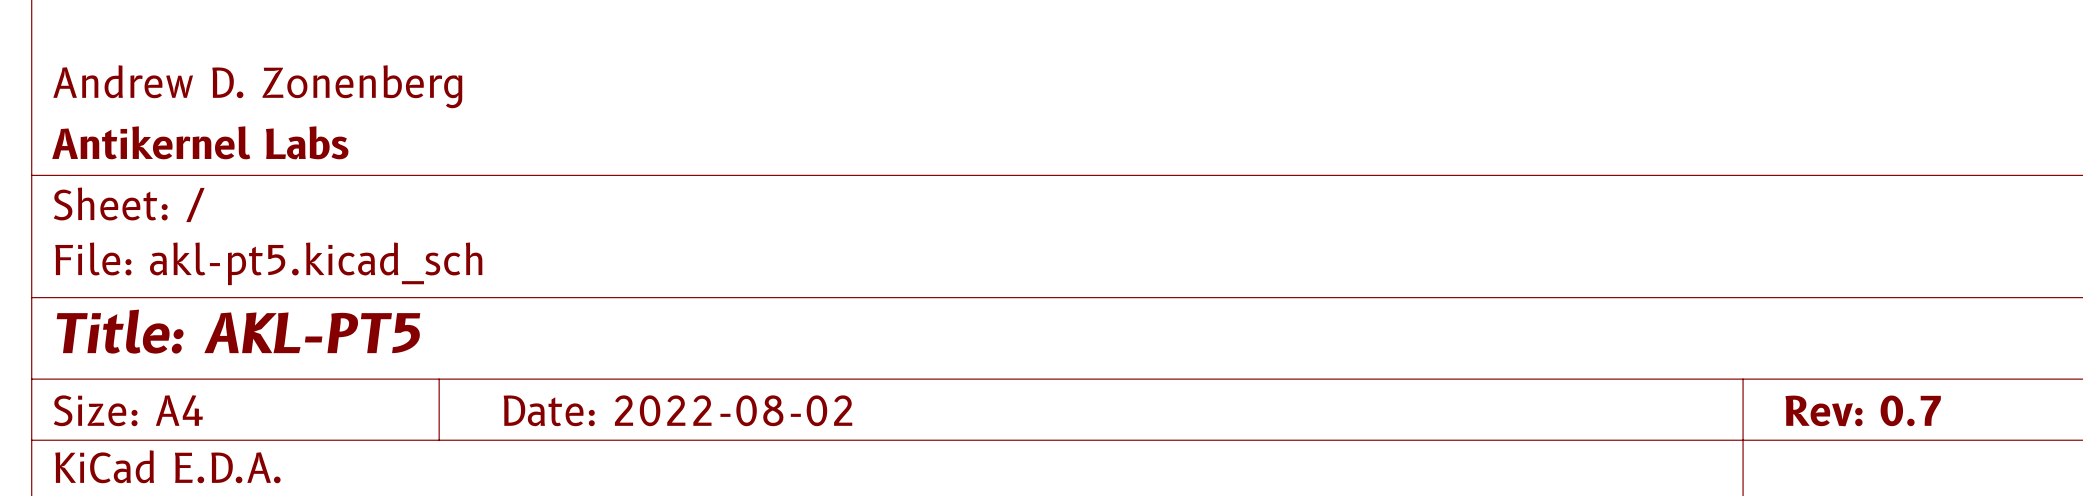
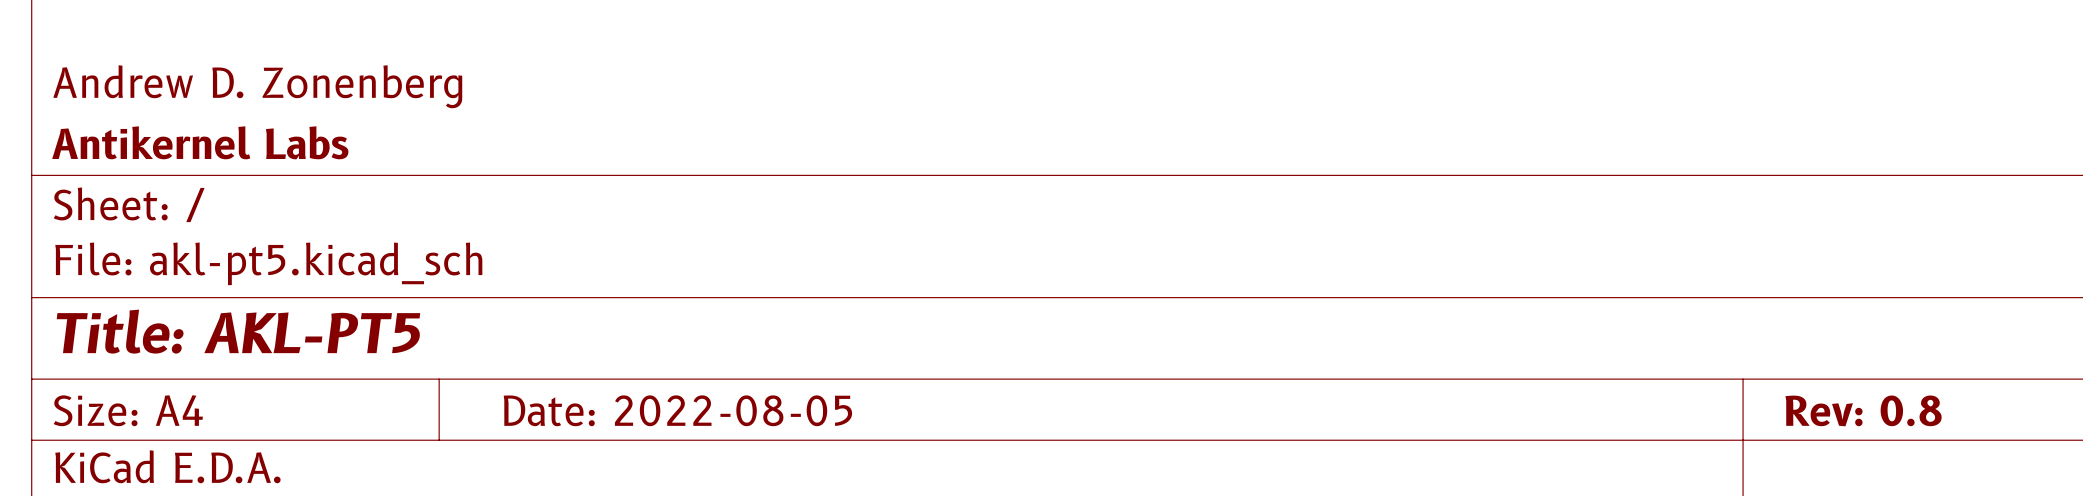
title block: Date: 2022-08-02 (677, 410) -> Date: 2022-08-05 (677, 410)
title block: Rev: 0.7 (1863, 410) -> Rev: 0.8 (1863, 410)

